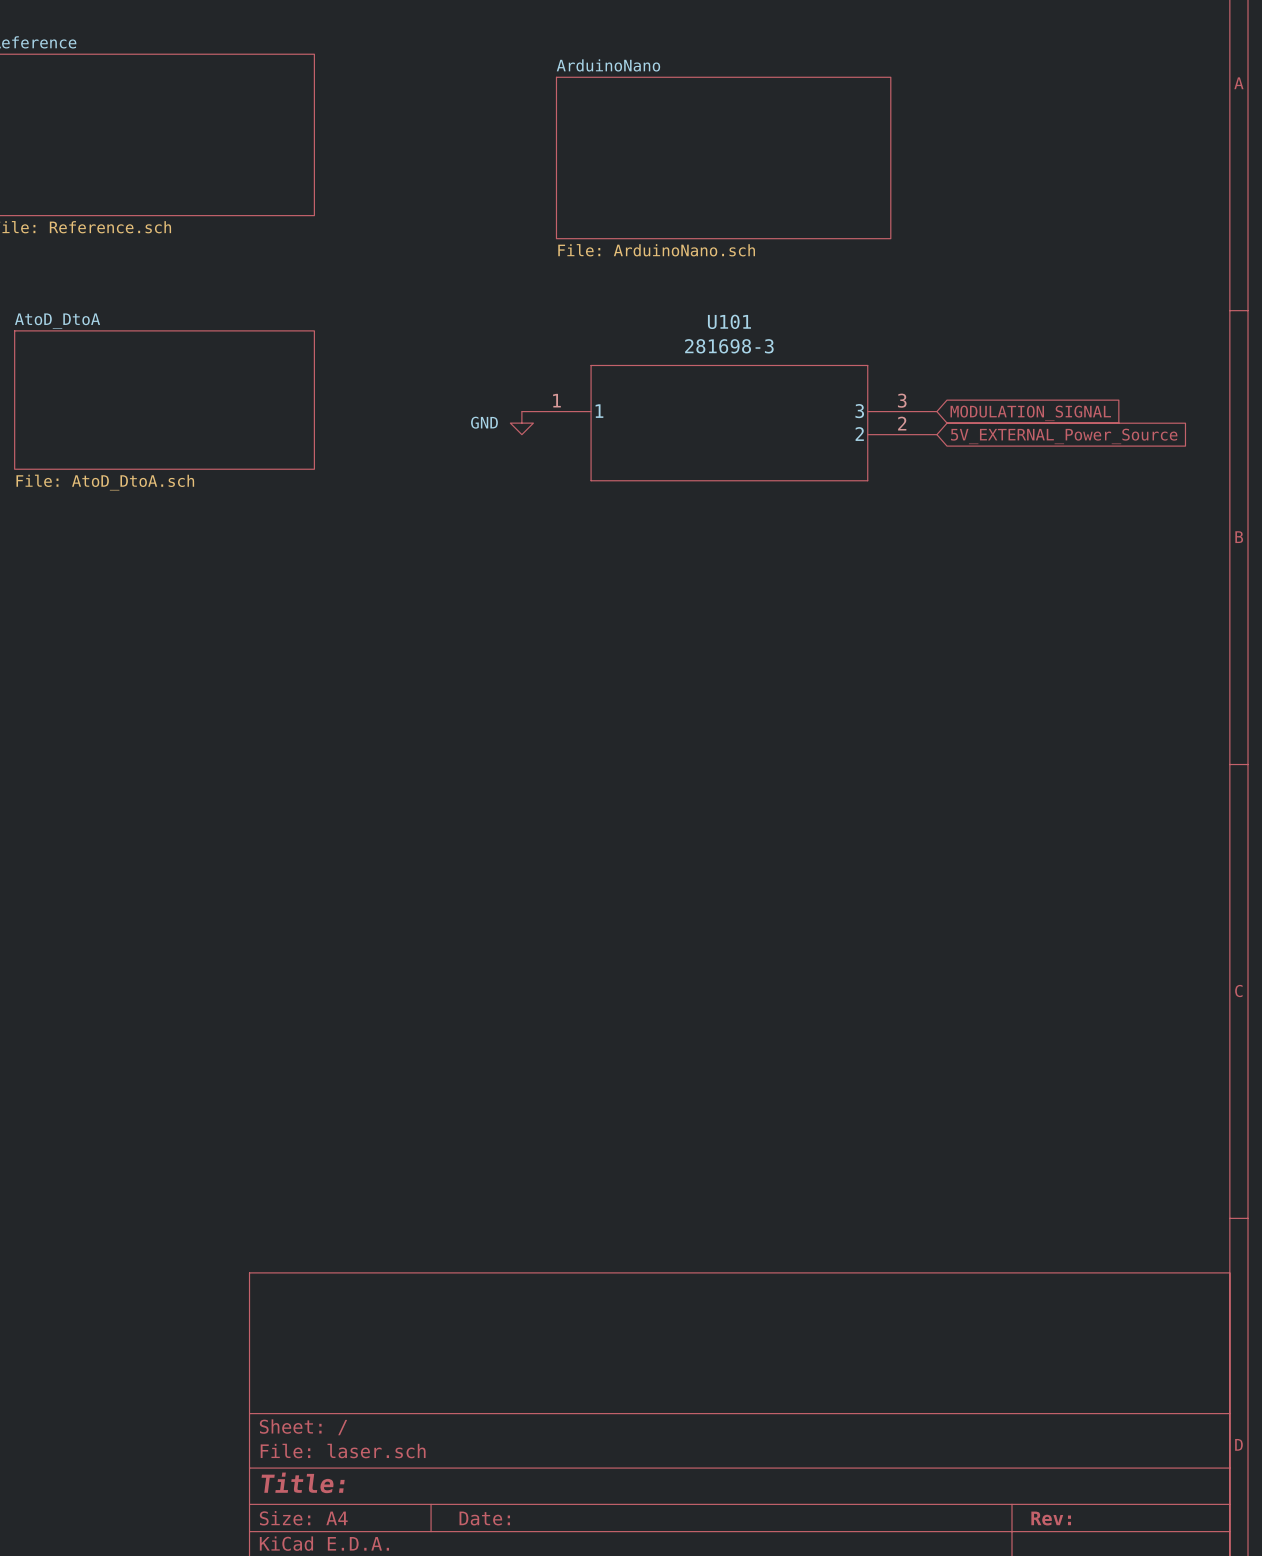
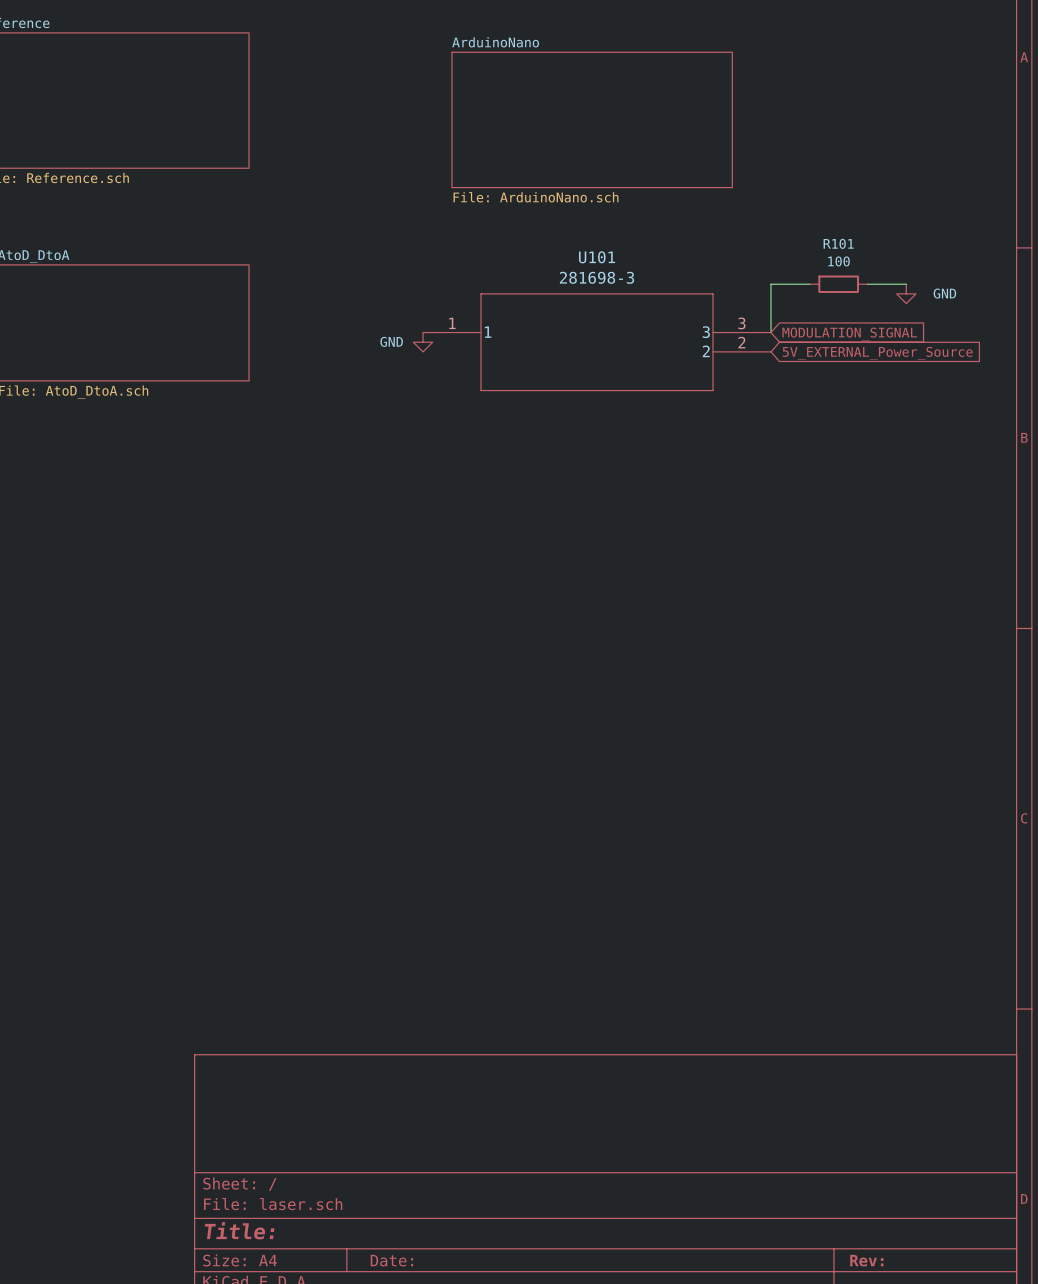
wire: none -> (809, 284) (771, 284) (771, 332)
R101: none -> 100 (838, 284)
wire: none -> (867, 284) (906, 284)
power symbol: none -> GND (906, 293)

